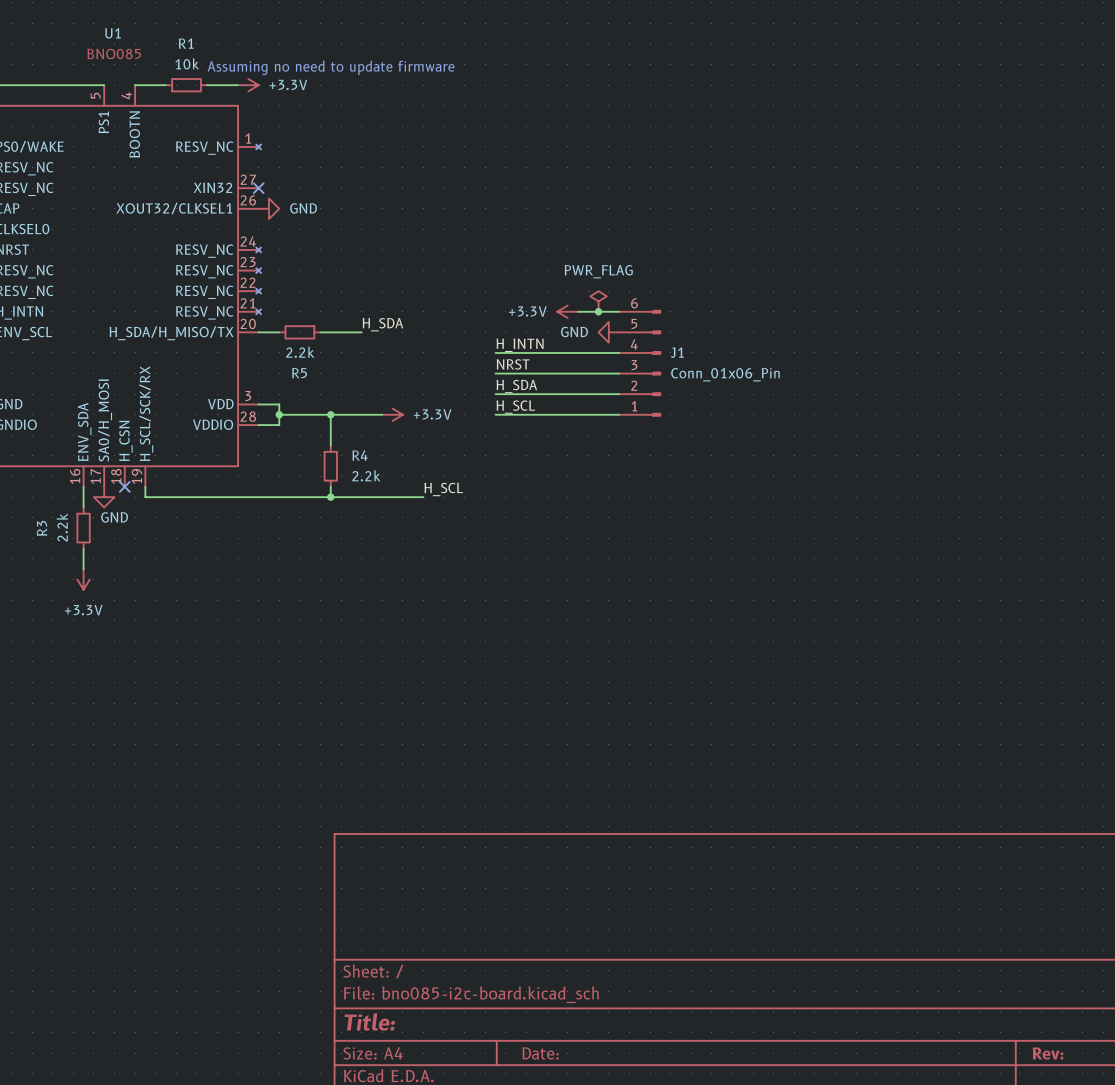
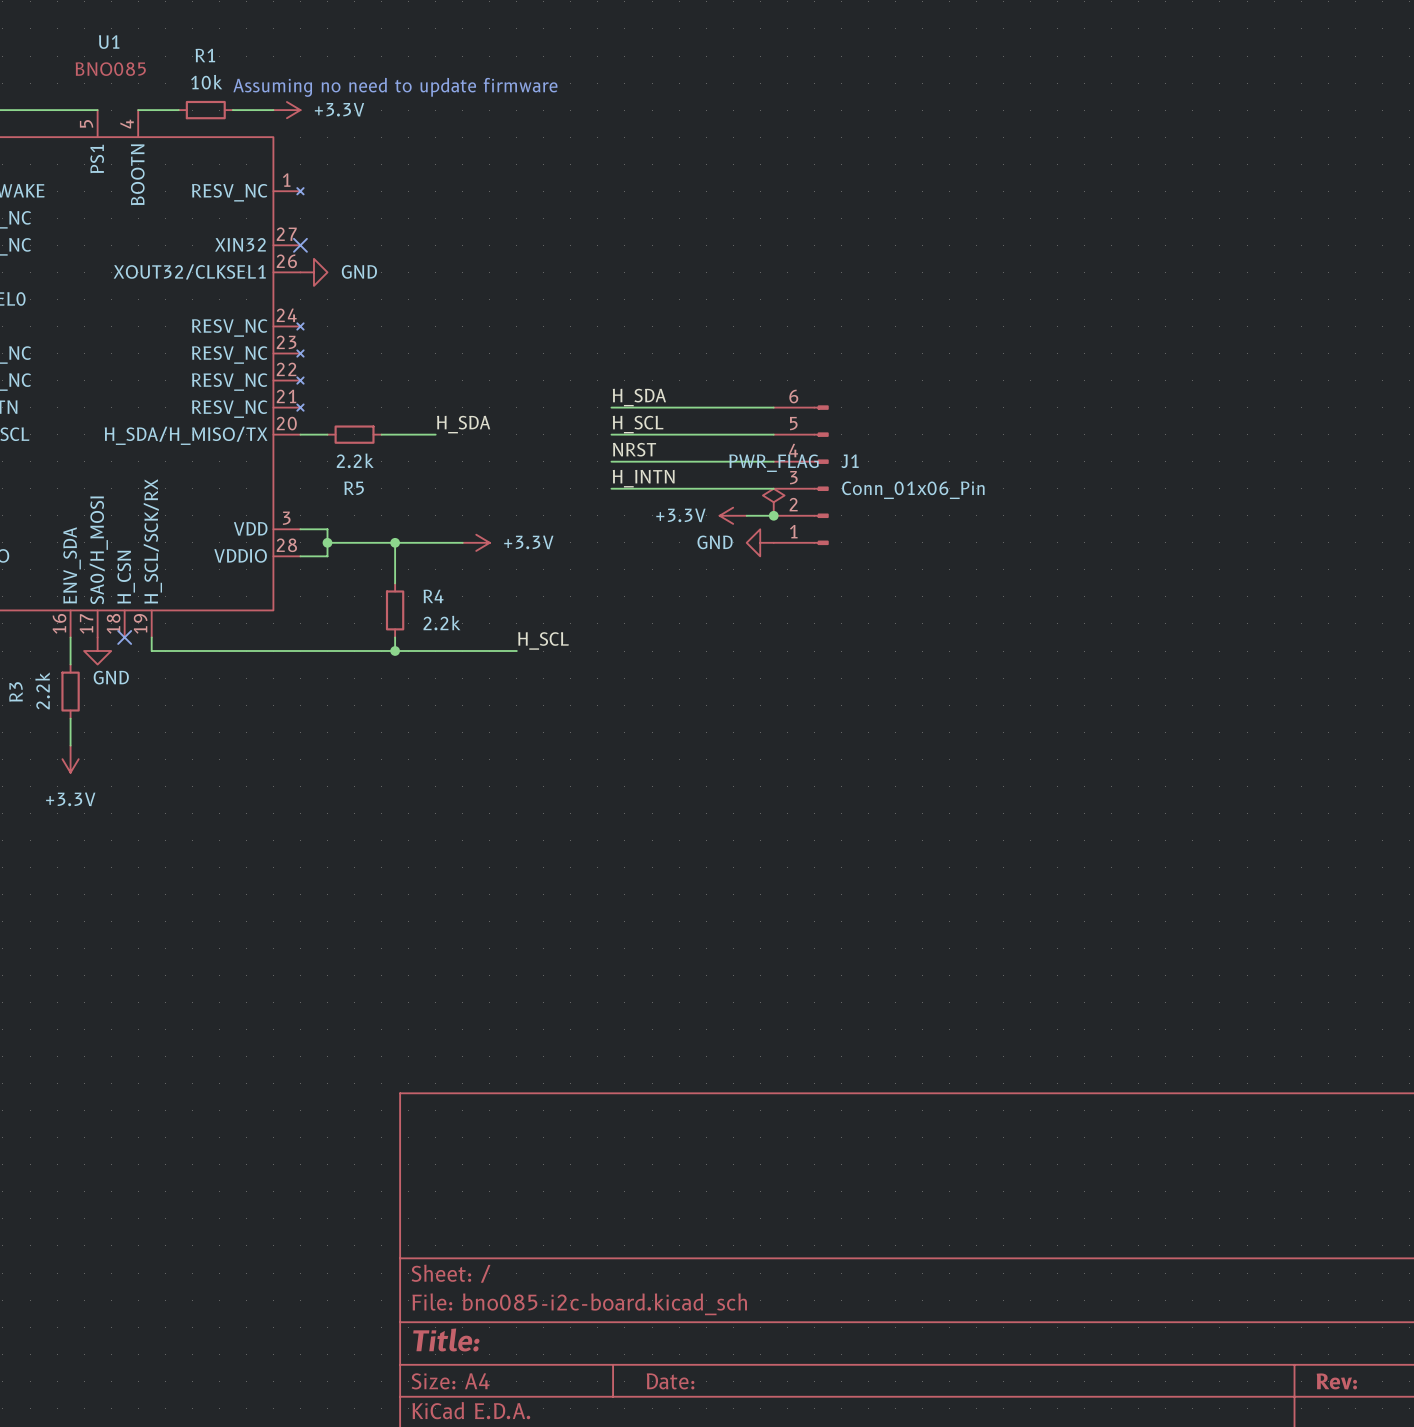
power symbol position: PWR_FLAG (598, 301) -> PWR_FLAG (773, 502)
wire: none -> (611, 407) (719, 407)
power symbol position: +3.3V (567, 311) -> +3.3V (733, 515)
junction: (598, 311) -> none
power symbol position: GND (608, 332) -> GND (760, 542)
label: H_INTN (520, 345) -> NRST (634, 449)
label: NRST (513, 364) -> H_INTN (643, 478)
label position: H_SDA (516, 386) -> H_SDA (639, 397)
wire: (495, 394) (598, 394) -> none
junction: none -> (773, 515)
label position: H_SCL (515, 407) -> H_SCL (638, 424)
wire: (495, 414) (619, 414) -> (611, 434) (773, 434)

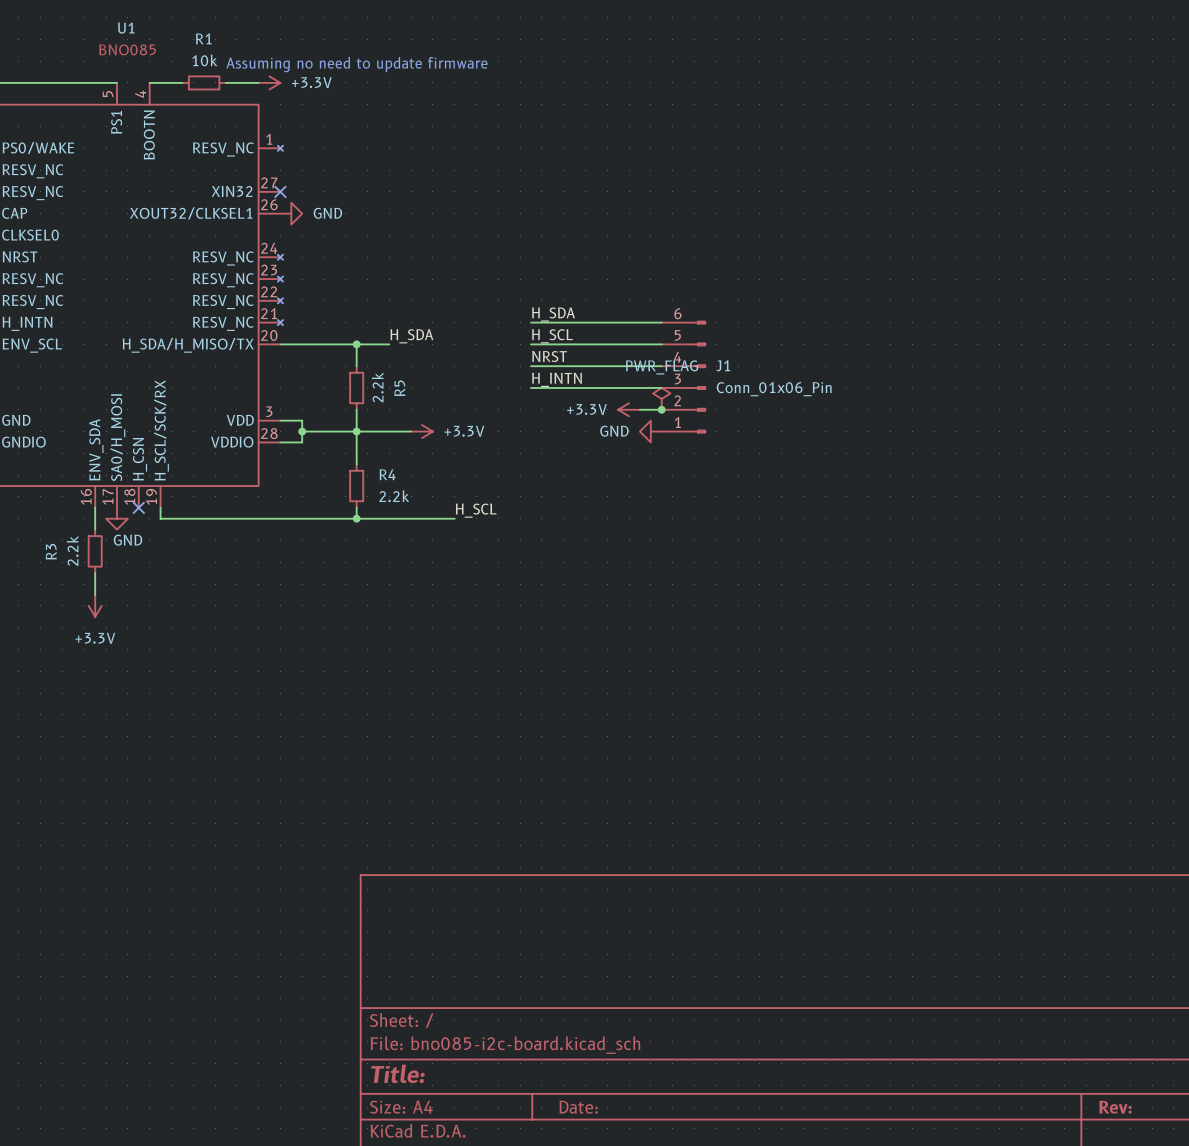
wire: none -> (302, 344) (345, 344)
R5 rotation: 0° (354, 434) -> 90° clockwise (356, 387)
R5 position: (354, 434) -> (356, 387)
wire: none -> (356, 344) (356, 366)
junction: none -> (356, 344)
R5 value position: 2.2k (355, 460) -> 2.2k (377, 387)
R5 name position: R5 (354, 488) -> R5 (399, 388)
wire: none -> (356, 409) (356, 431)

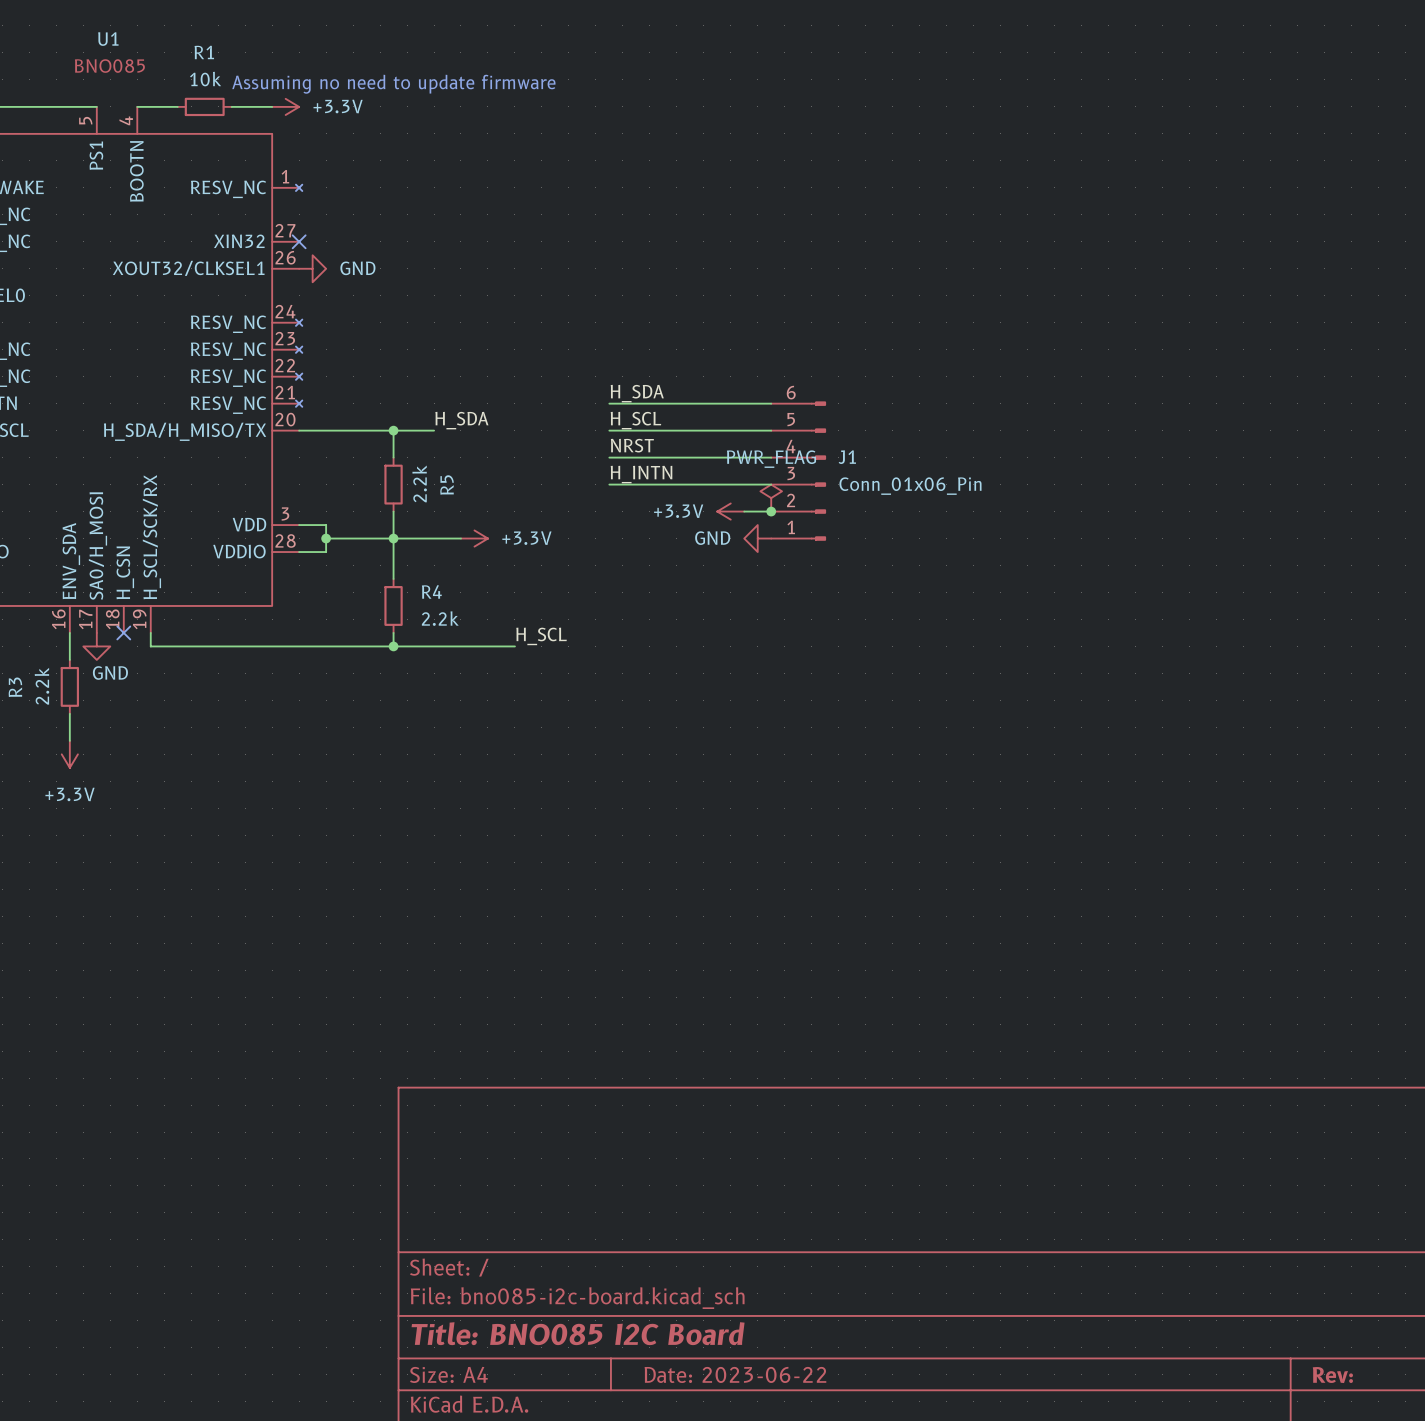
title block: Title: (397, 1073) -> Title: BNO085 I2C Board (578, 1333)
title block: Date: (578, 1107) -> Date: 2023-06-22 (735, 1374)

